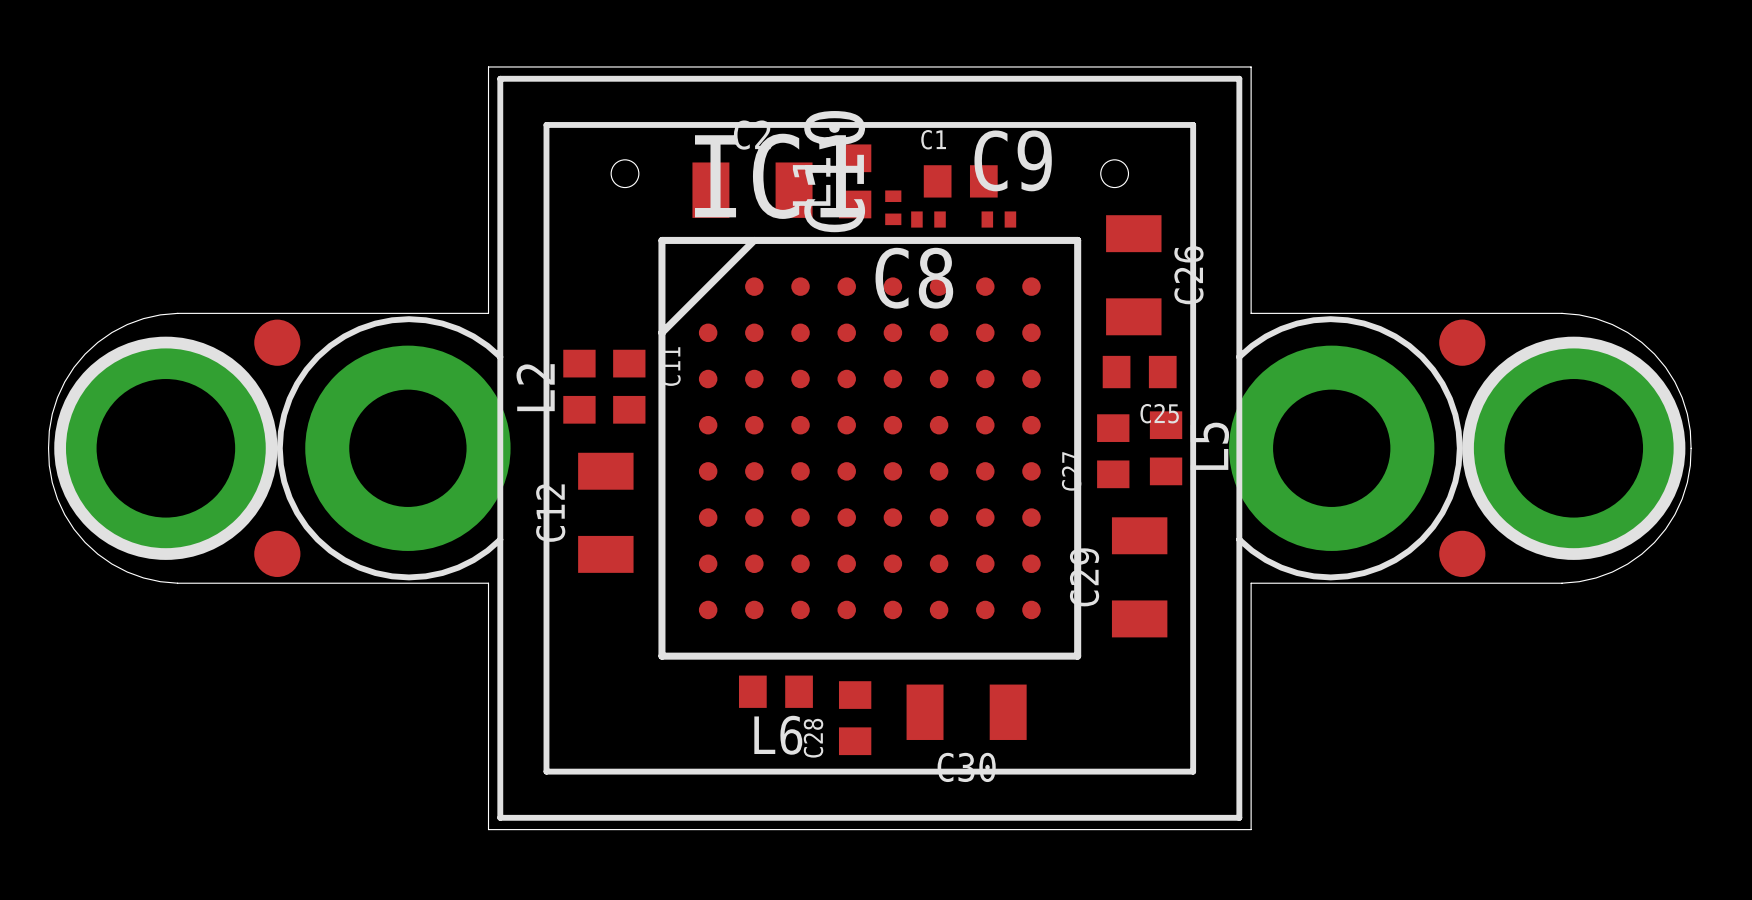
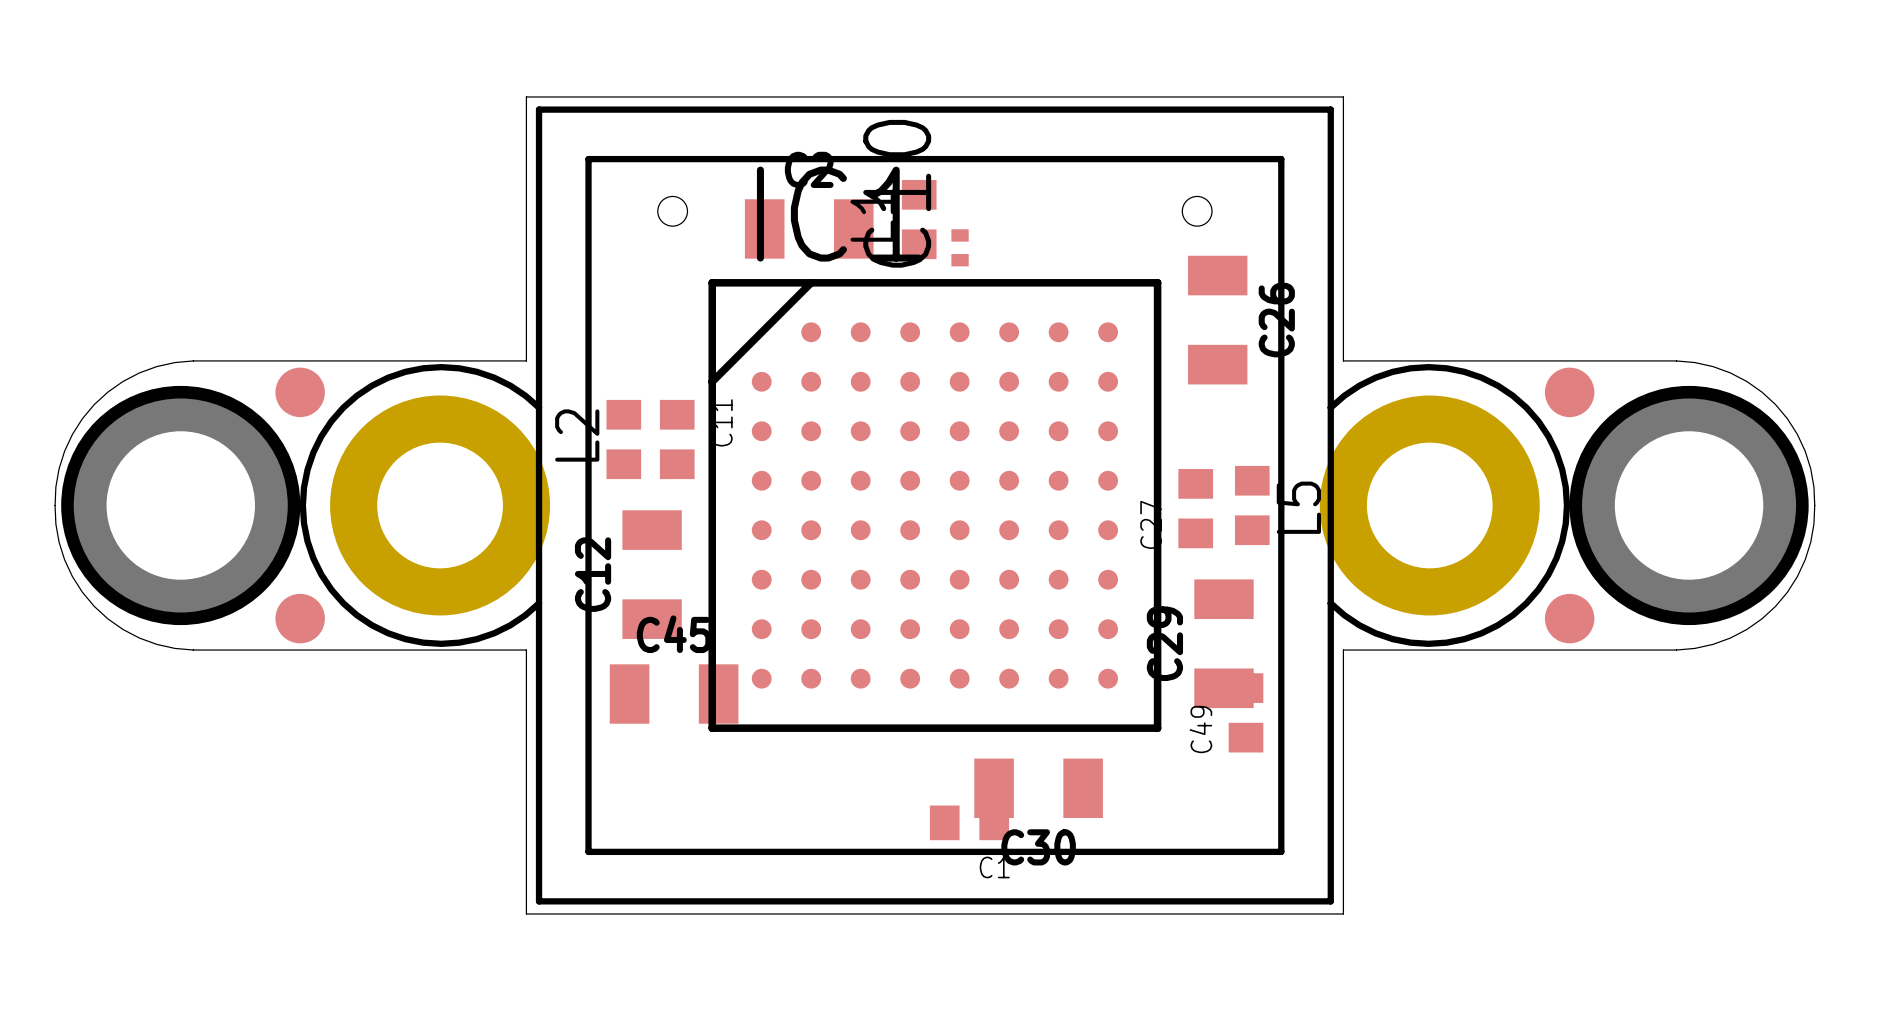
C1 name position: C1 (933, 139) -> C1 (994, 867)
C1 position: (960, 181) -> (969, 822)
C8: (928, 219) -> none
C9: (998, 219) -> none
C25: (1139, 372) -> none
C45: none -> (674, 694)
C49: none -> (1245, 712)
L6: (775, 691) -> none
C28: (855, 718) -> none

